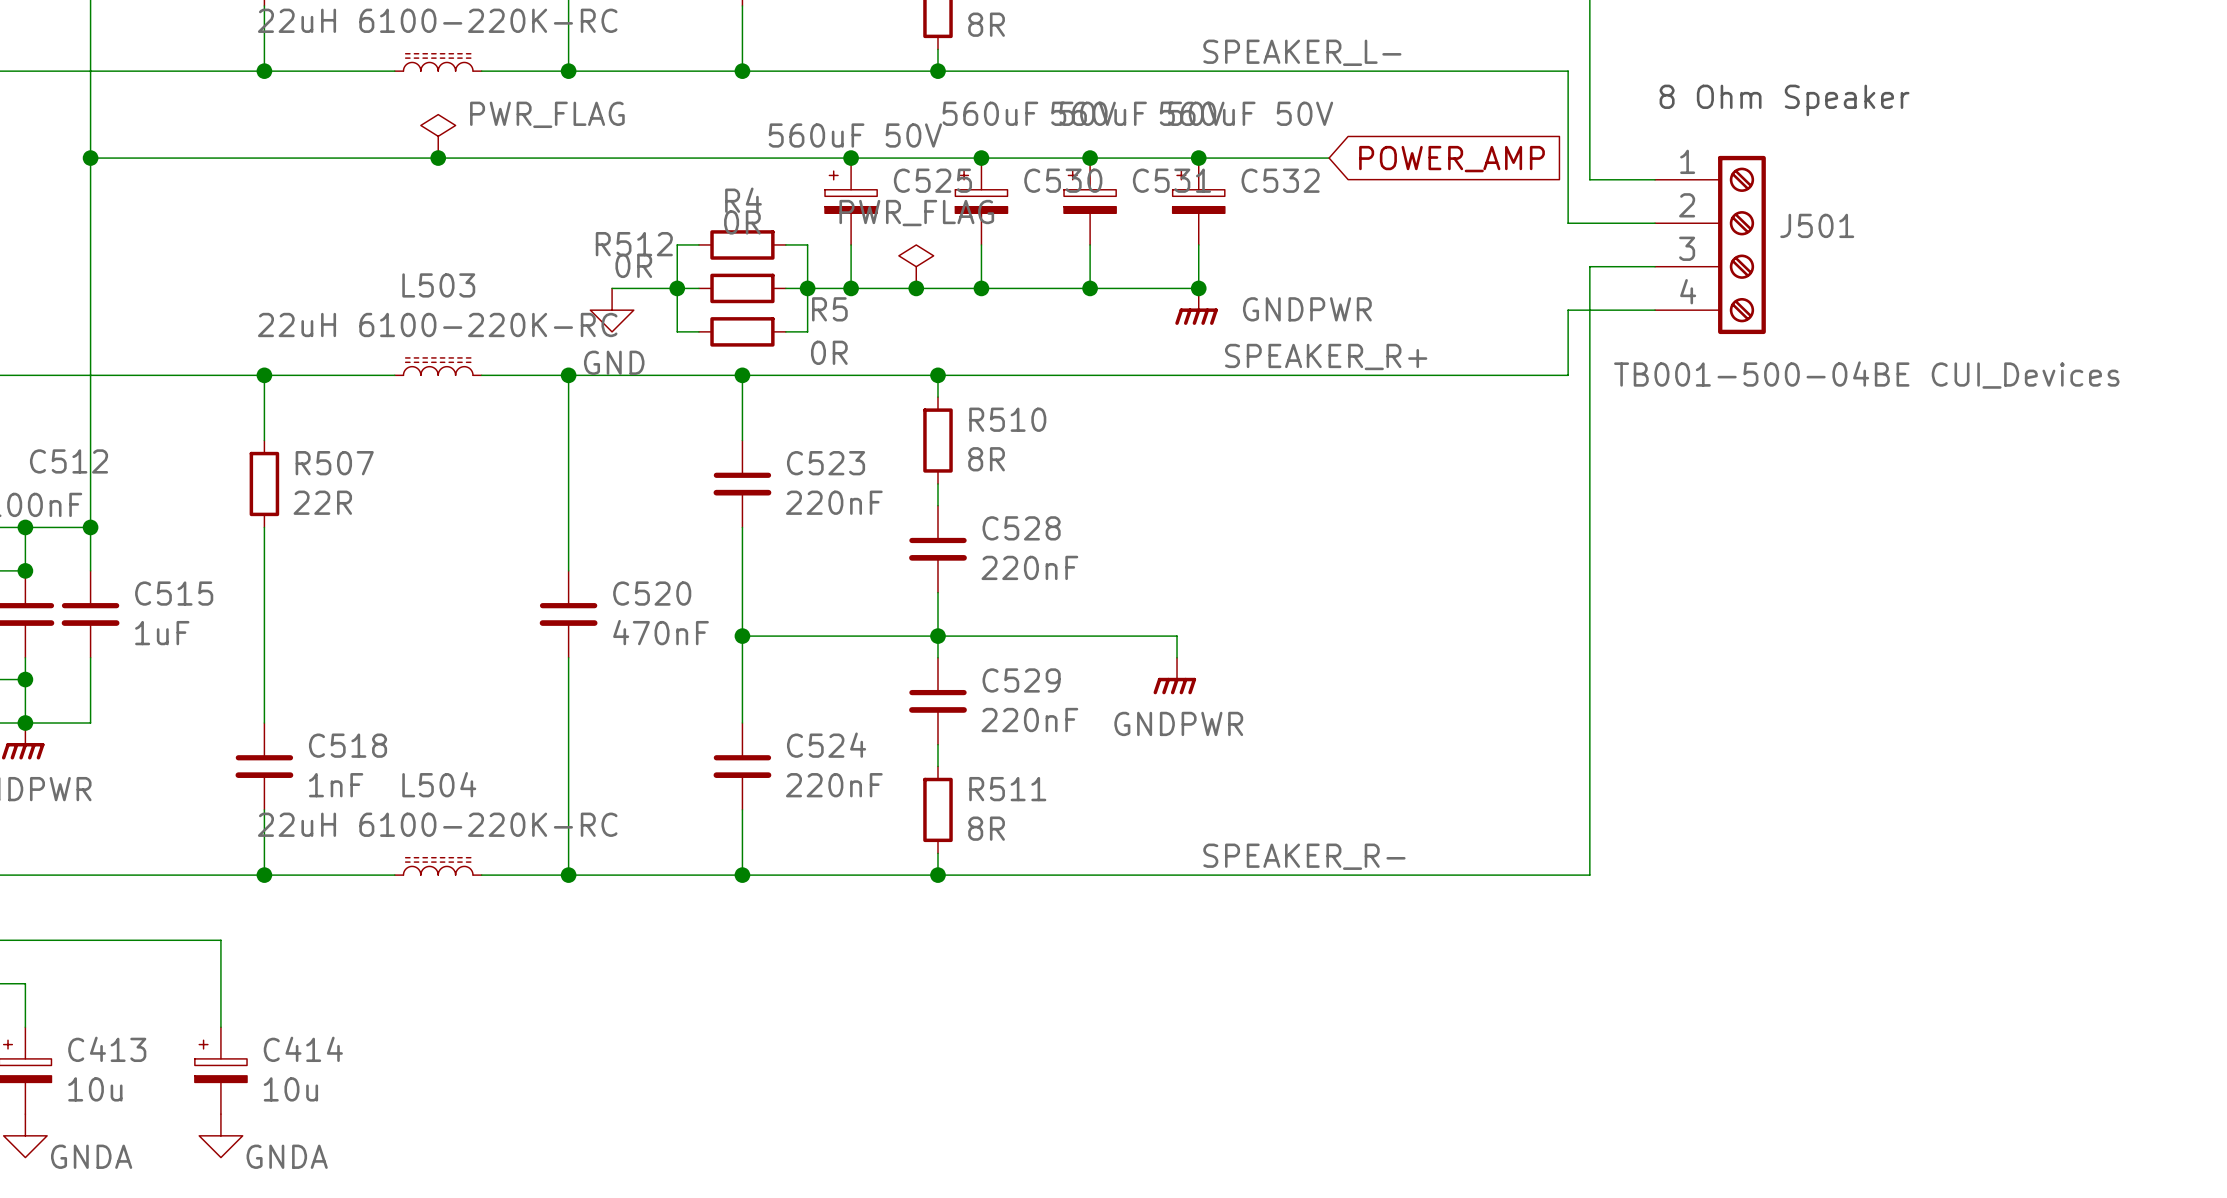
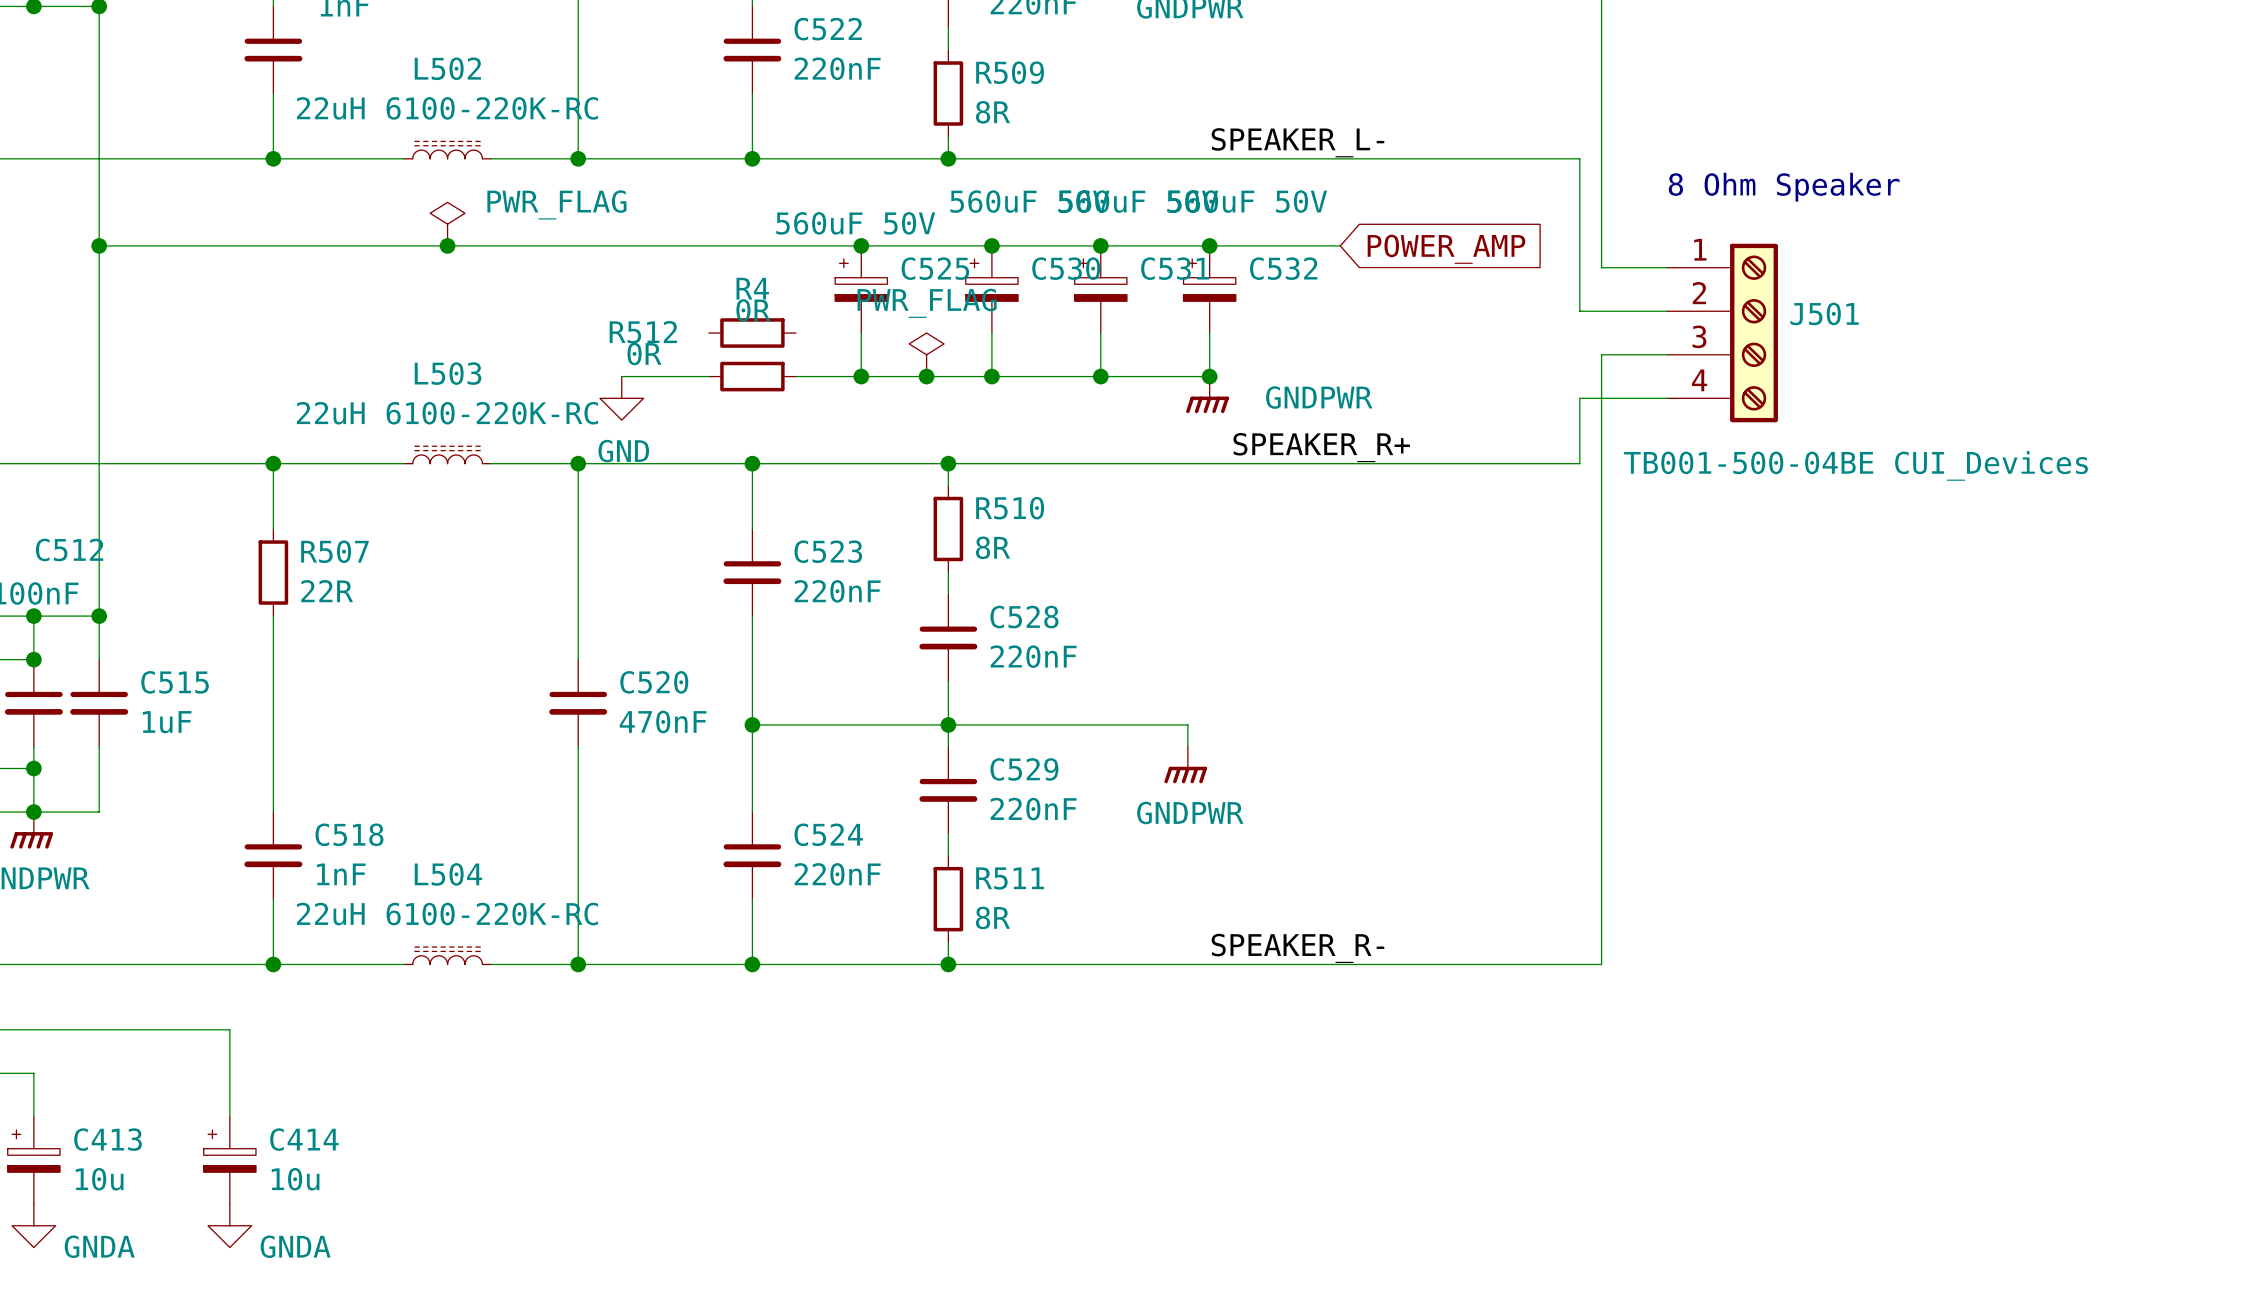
wire: (698, 244) (677, 244) (677, 331) (698, 331) -> none
wire: (785, 244) (807, 244) (807, 331) (785, 331) -> none
junction: (677, 288) -> none
junction: (807, 288) -> none
R5: 0R (742, 331) -> none

